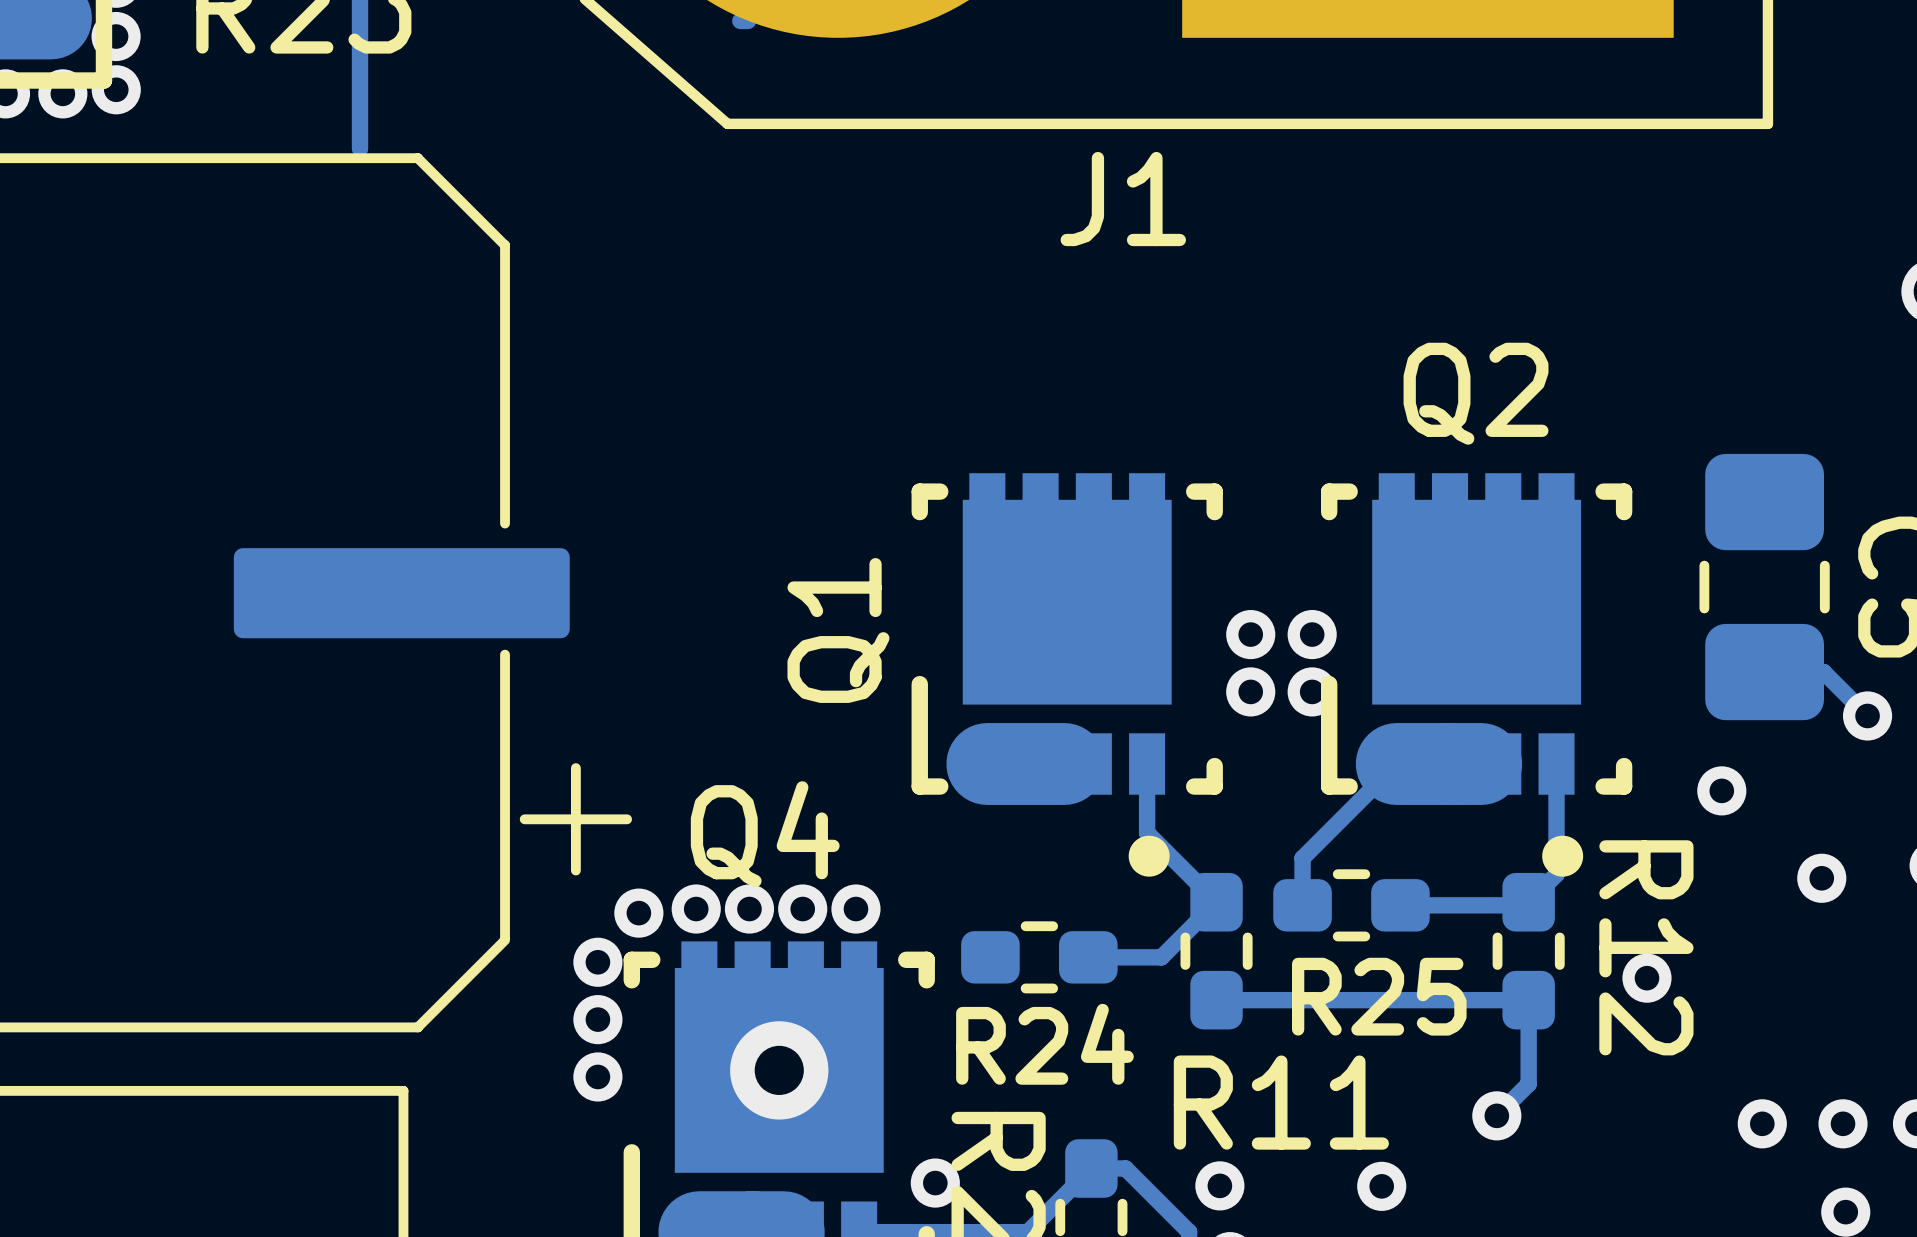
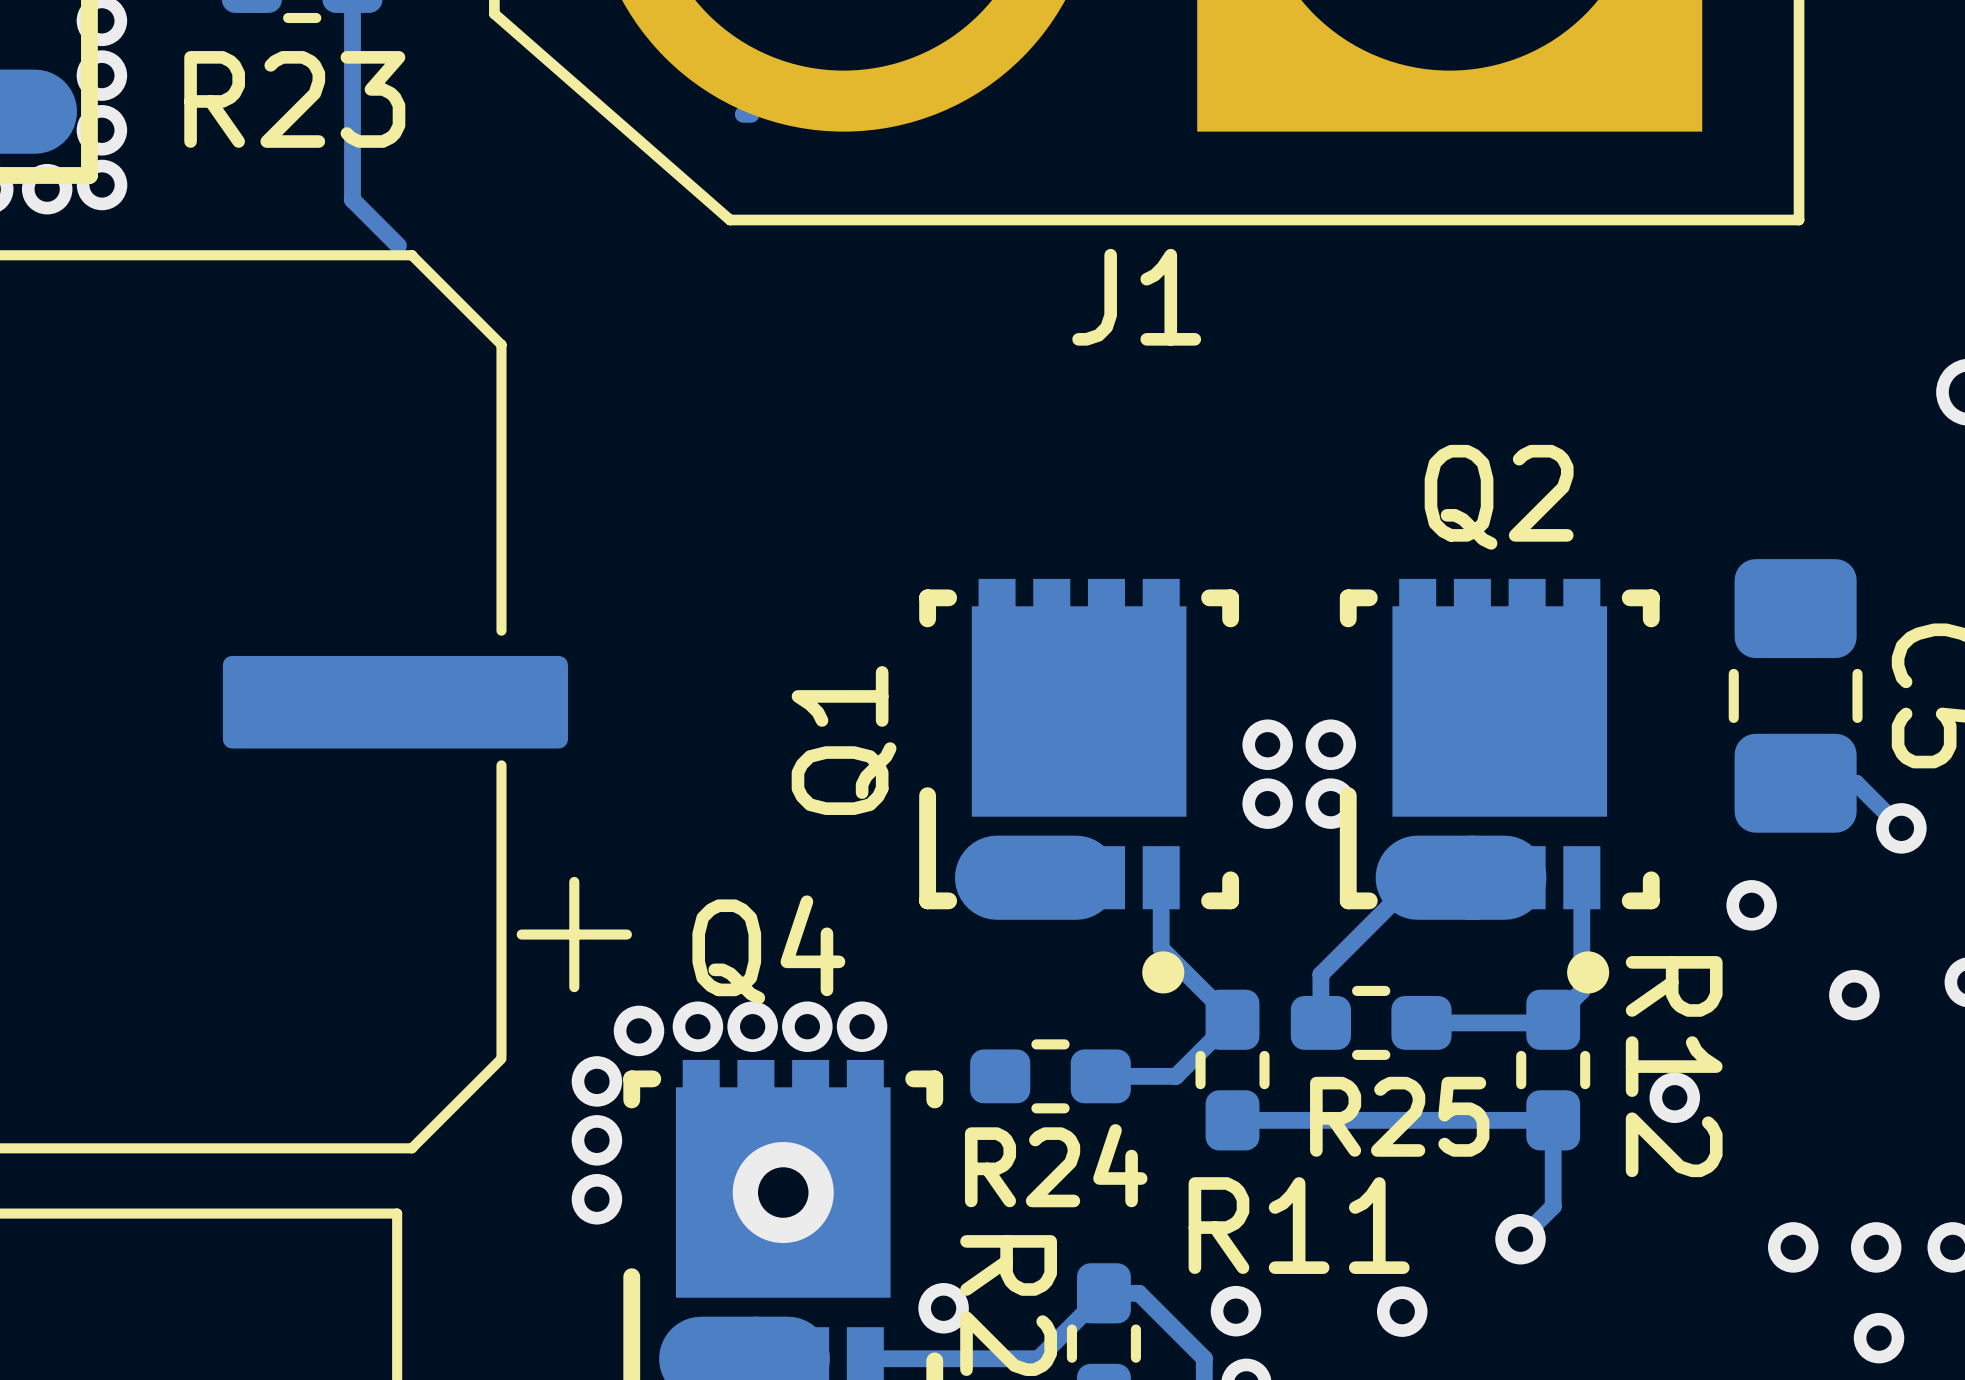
track: (360, 104) (360, 148) -> (352, 199) (398, 245)

